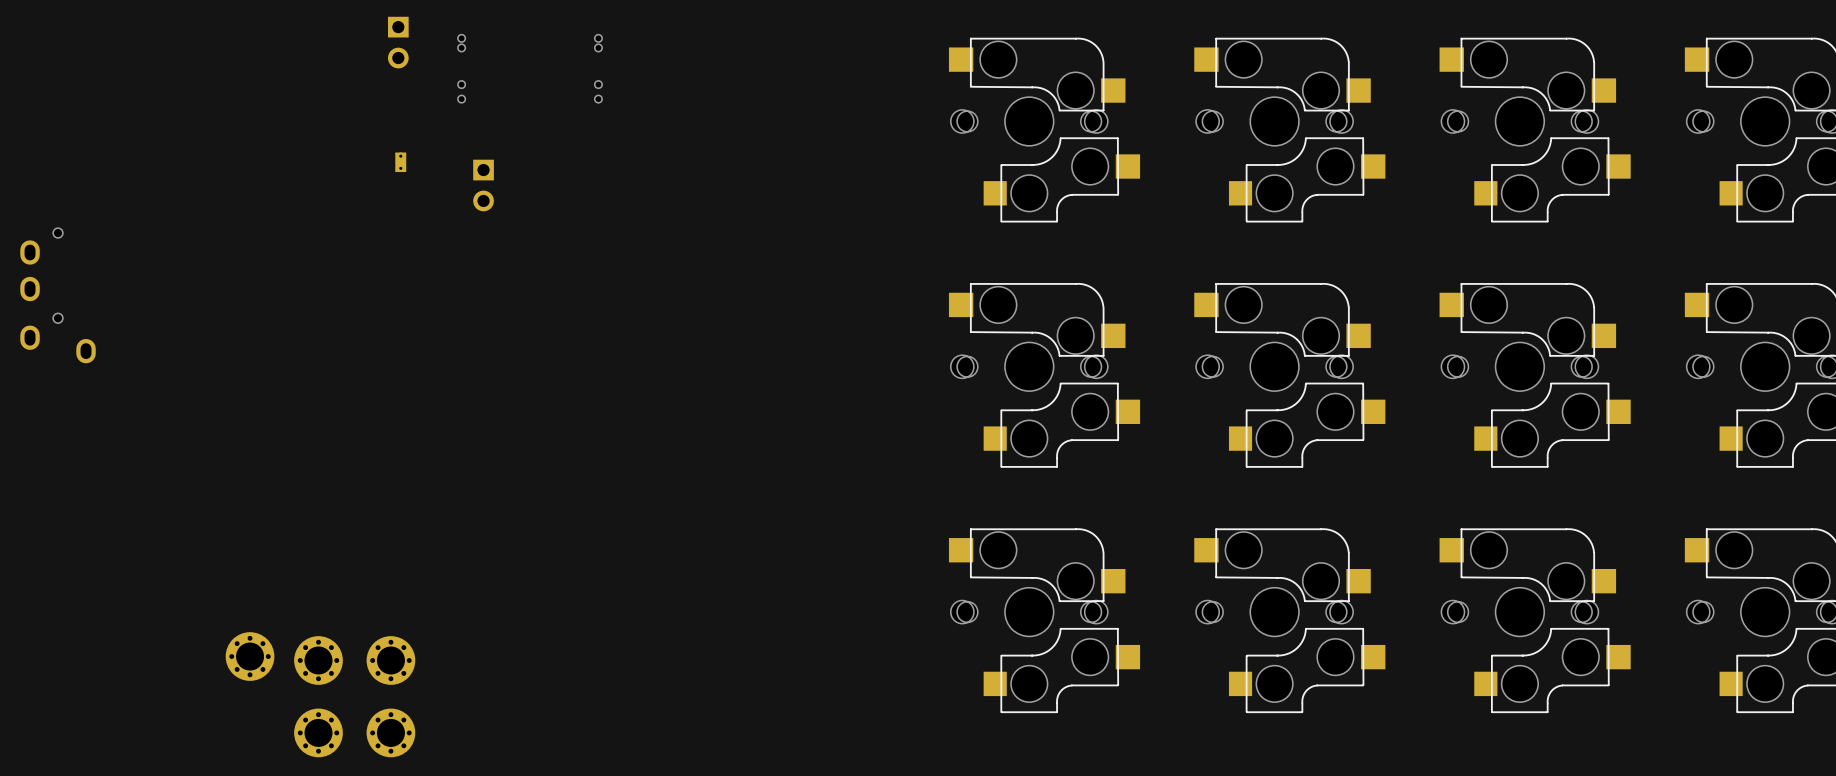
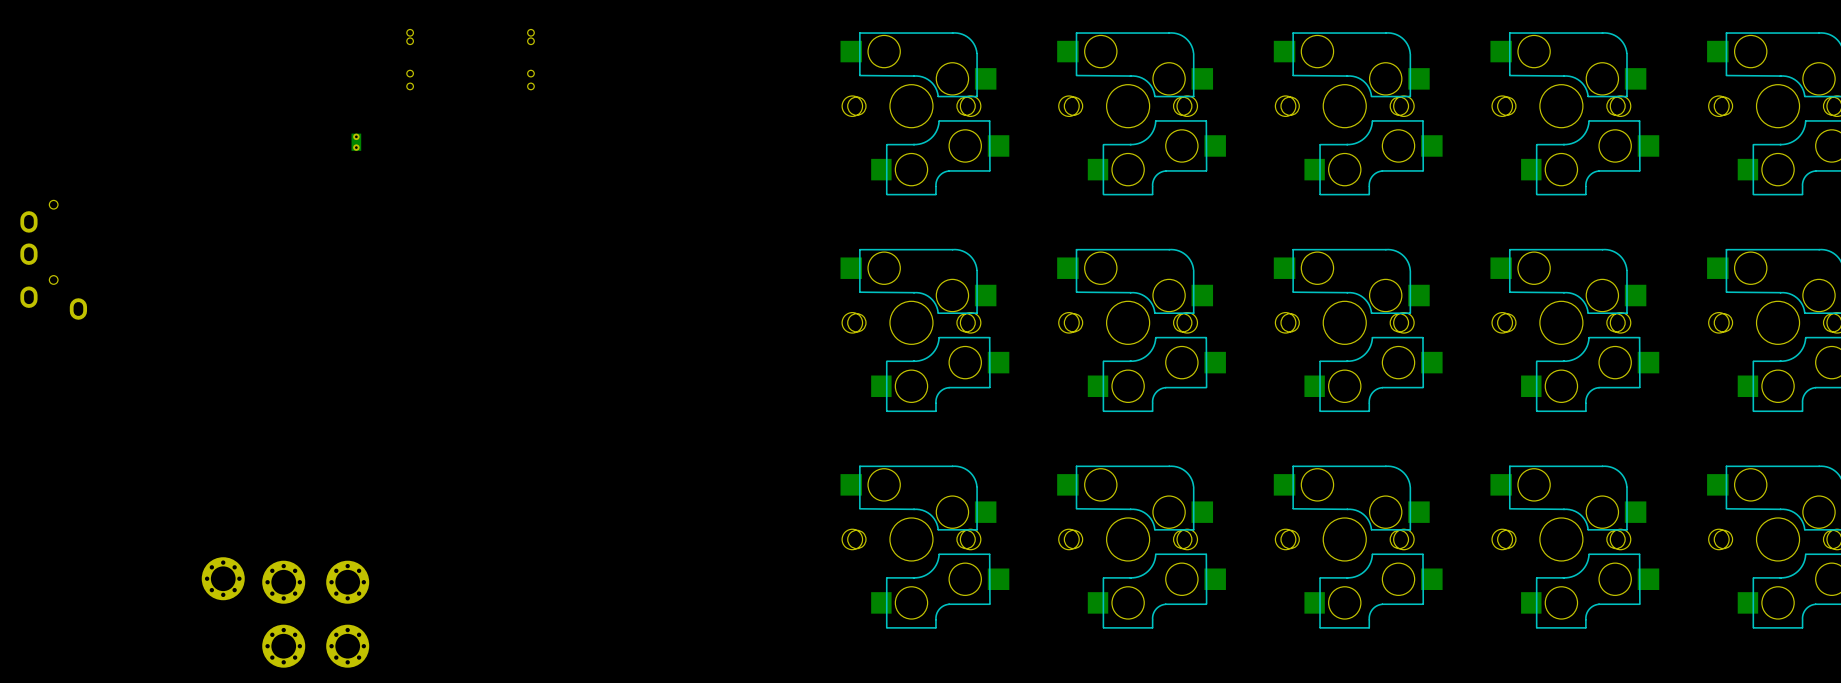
part: (398, 42) -> none
part: (483, 185) -> none

